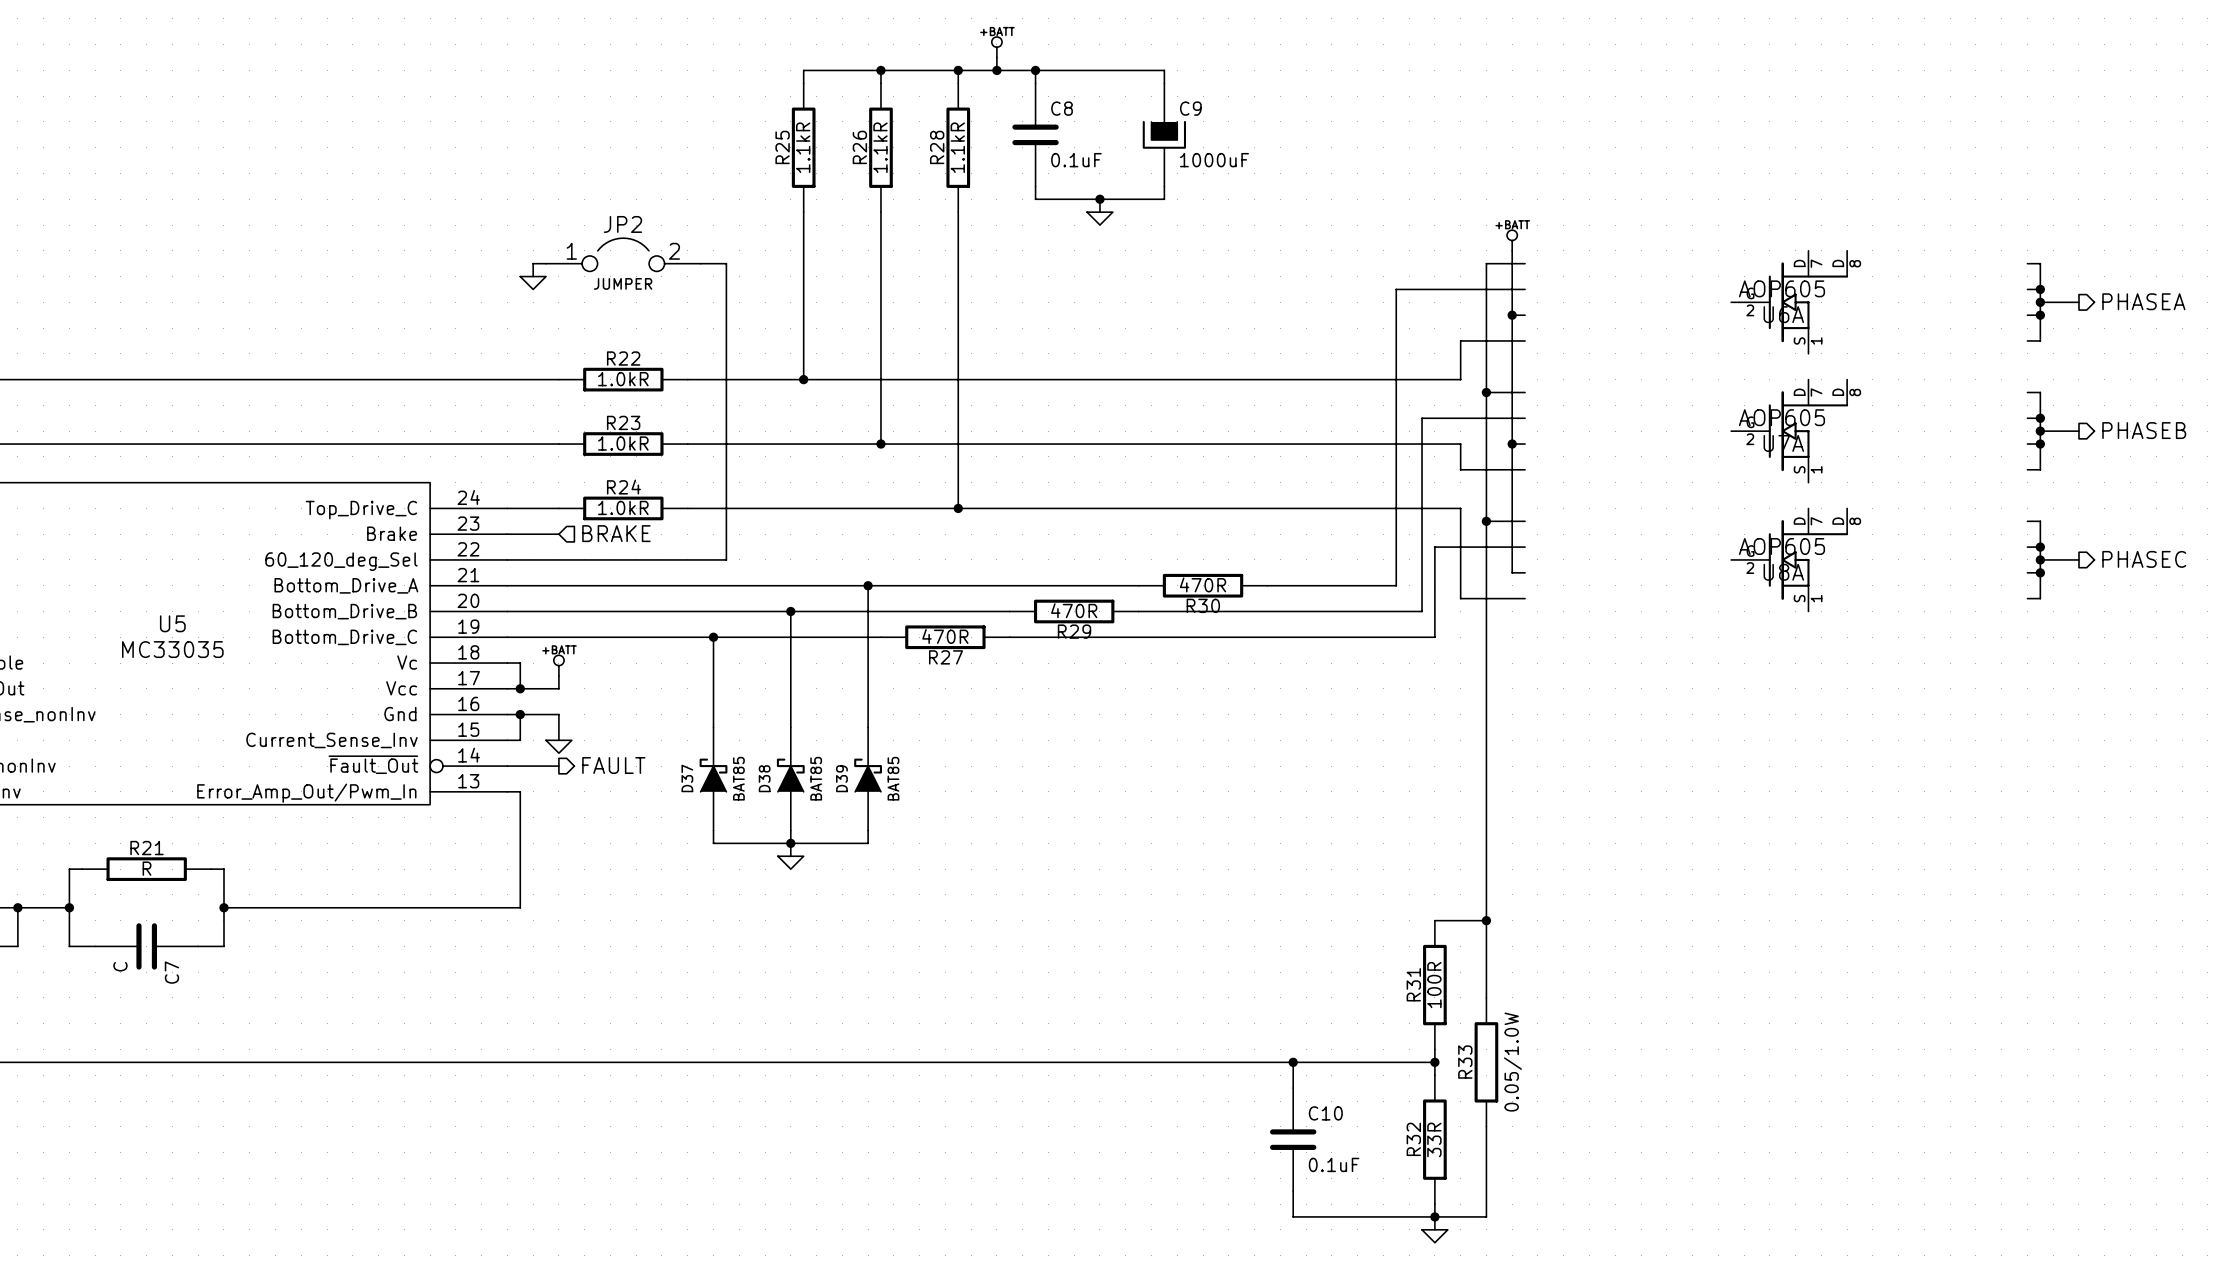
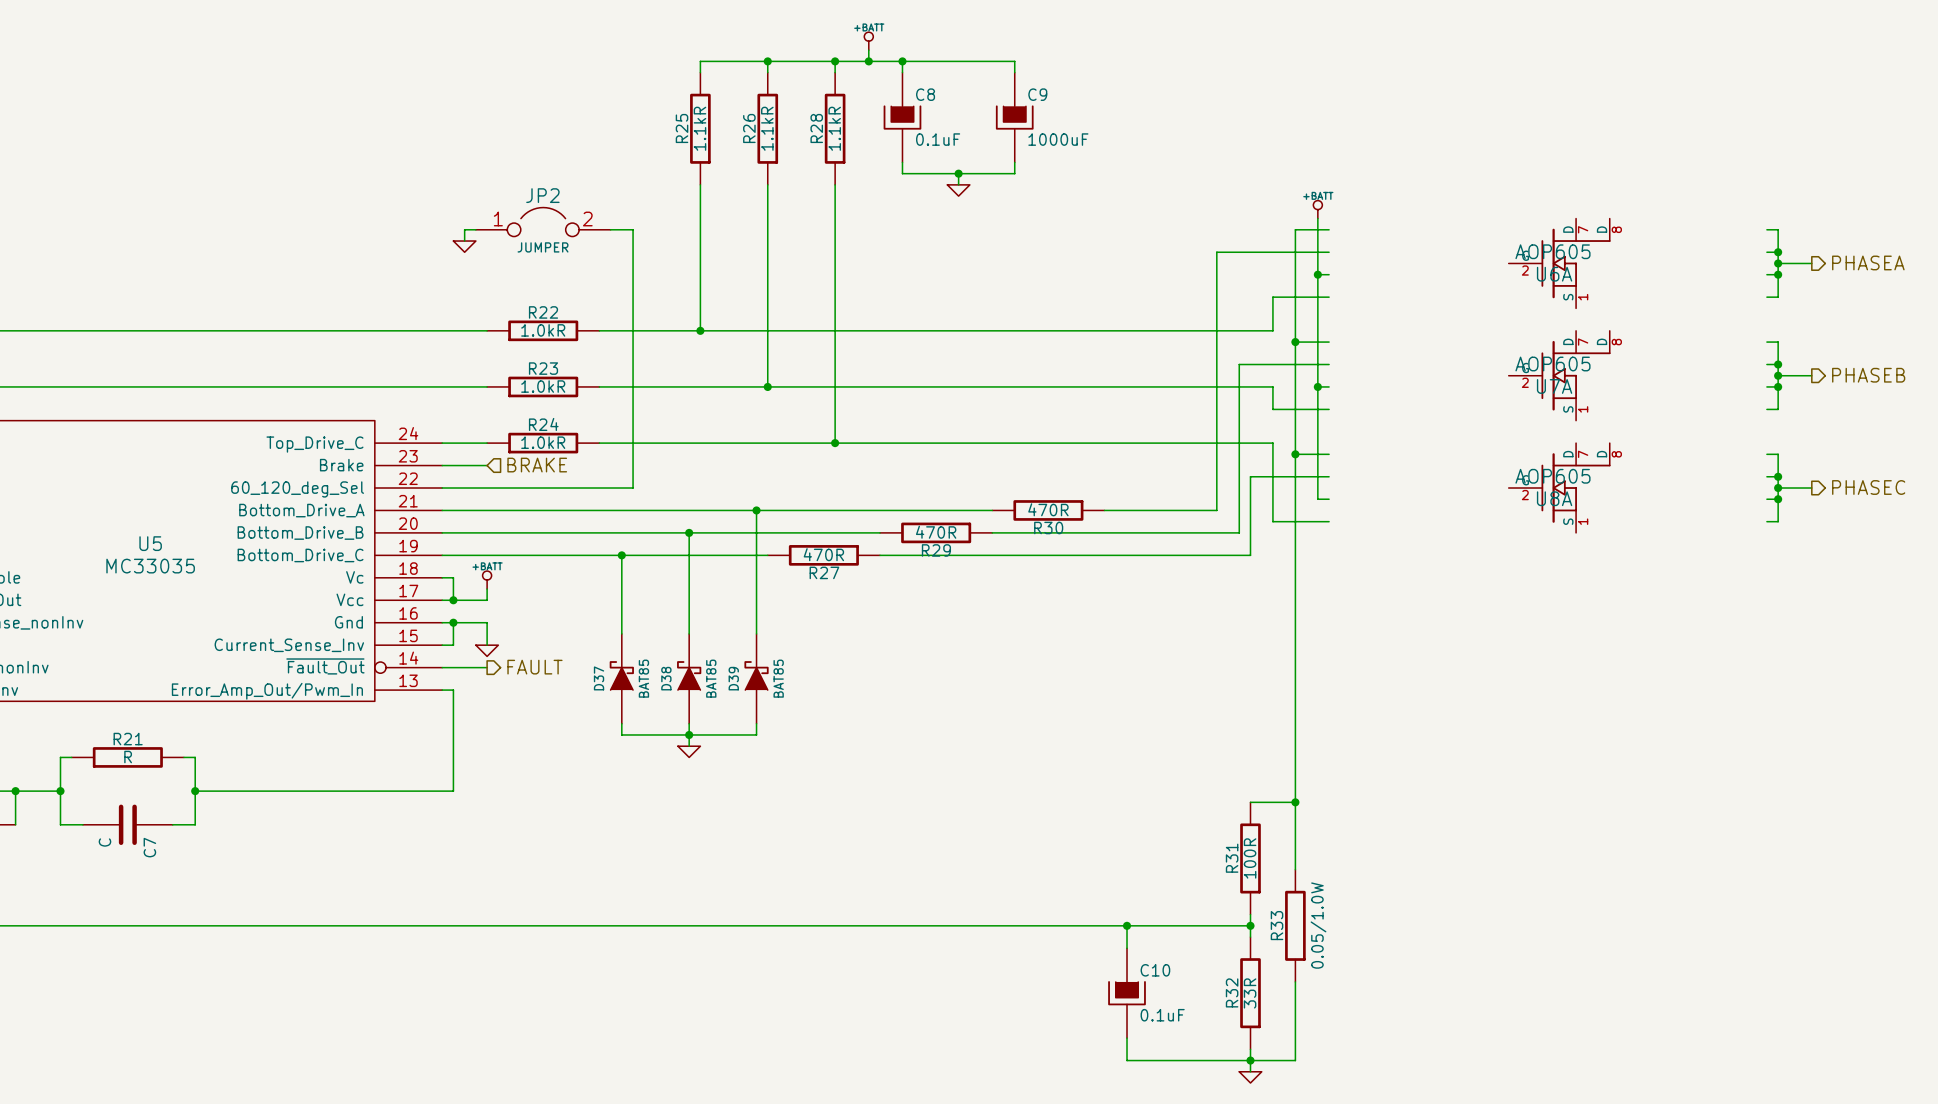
C8 symbol: [1012, 83, 1059, 187] -> [883, 72, 922, 163]
C10 symbol: [1270, 1088, 1317, 1192] -> [1108, 948, 1146, 1039]

